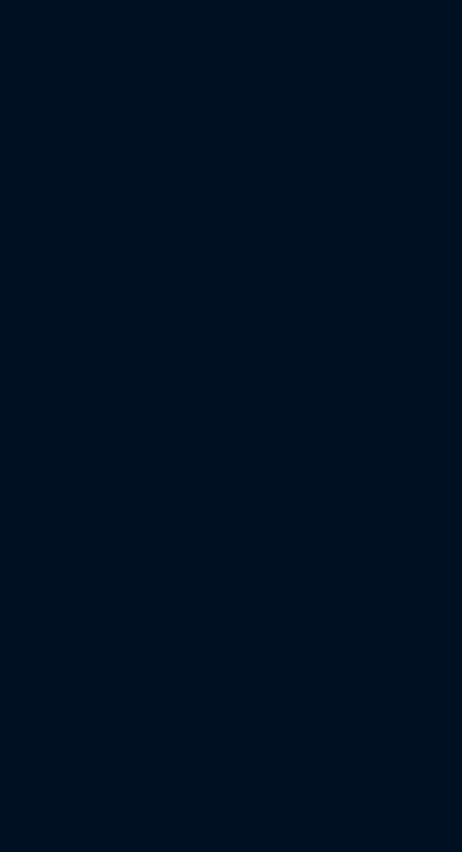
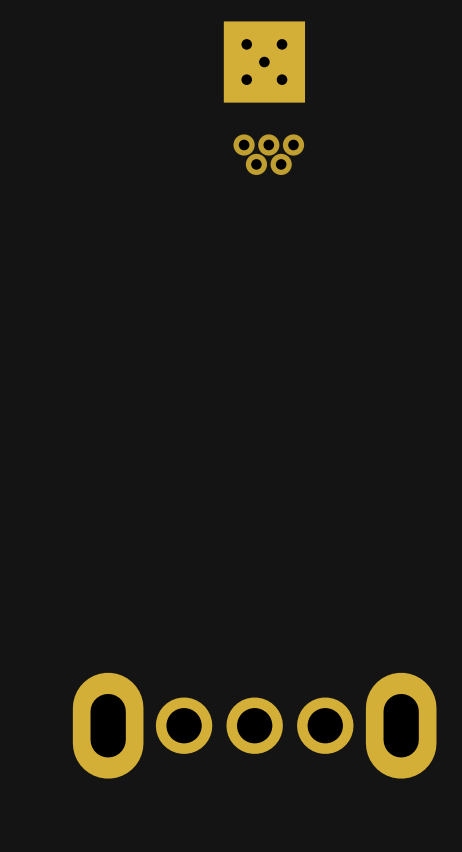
part: none -> (264, 62)
via: none -> (244, 144)
via: none -> (268, 144)
via: none -> (293, 144)
via: none -> (256, 164)
via: none -> (281, 164)
part: none -> (254, 725)

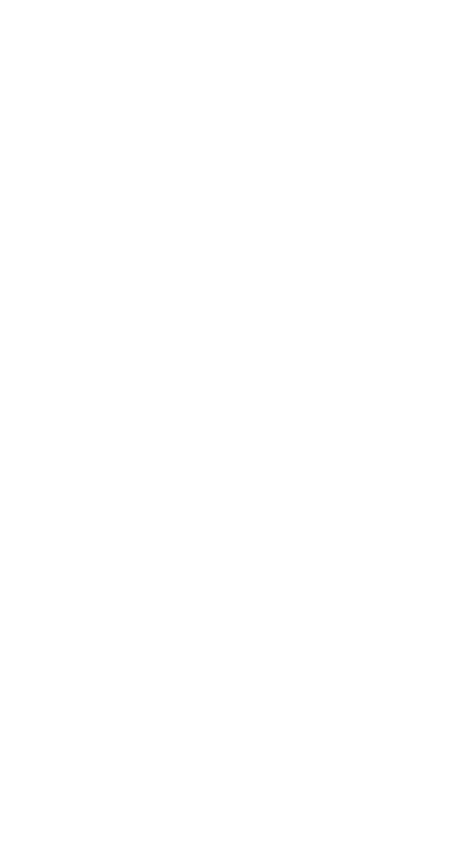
part: (264, 62) -> none
via: (244, 144) -> none
via: (268, 144) -> none
via: (293, 144) -> none
via: (256, 164) -> none
via: (281, 164) -> none
part: (254, 725) -> none

